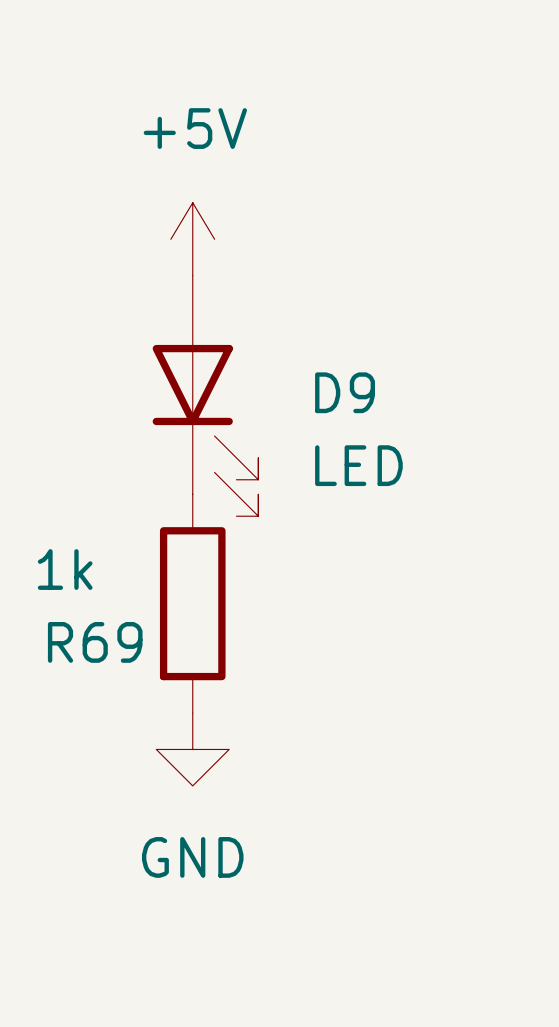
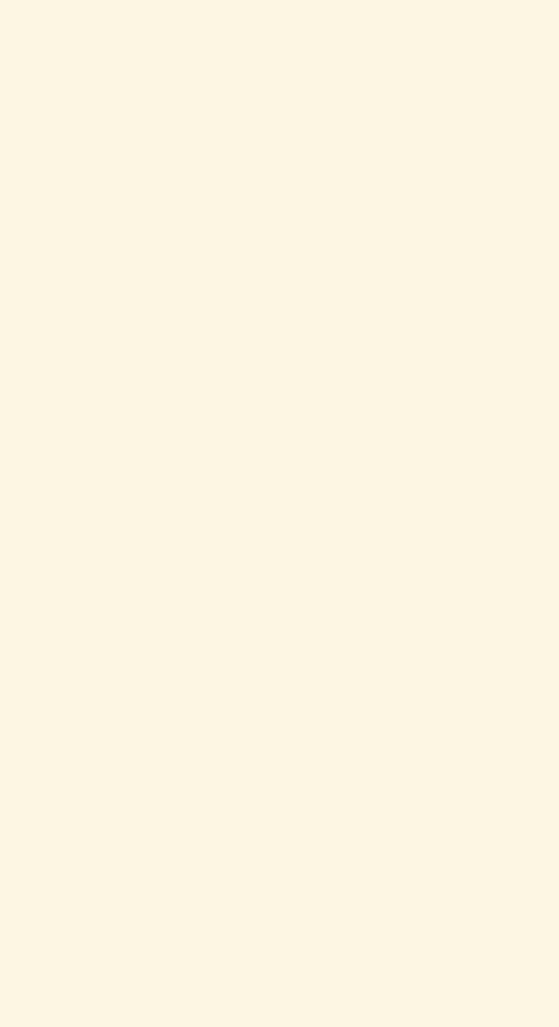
power symbol: +5V (192, 239) -> none
D9: LED (205, 395) -> none
R69: 1k (192, 603) -> none
power symbol: GND (192, 749) -> none

